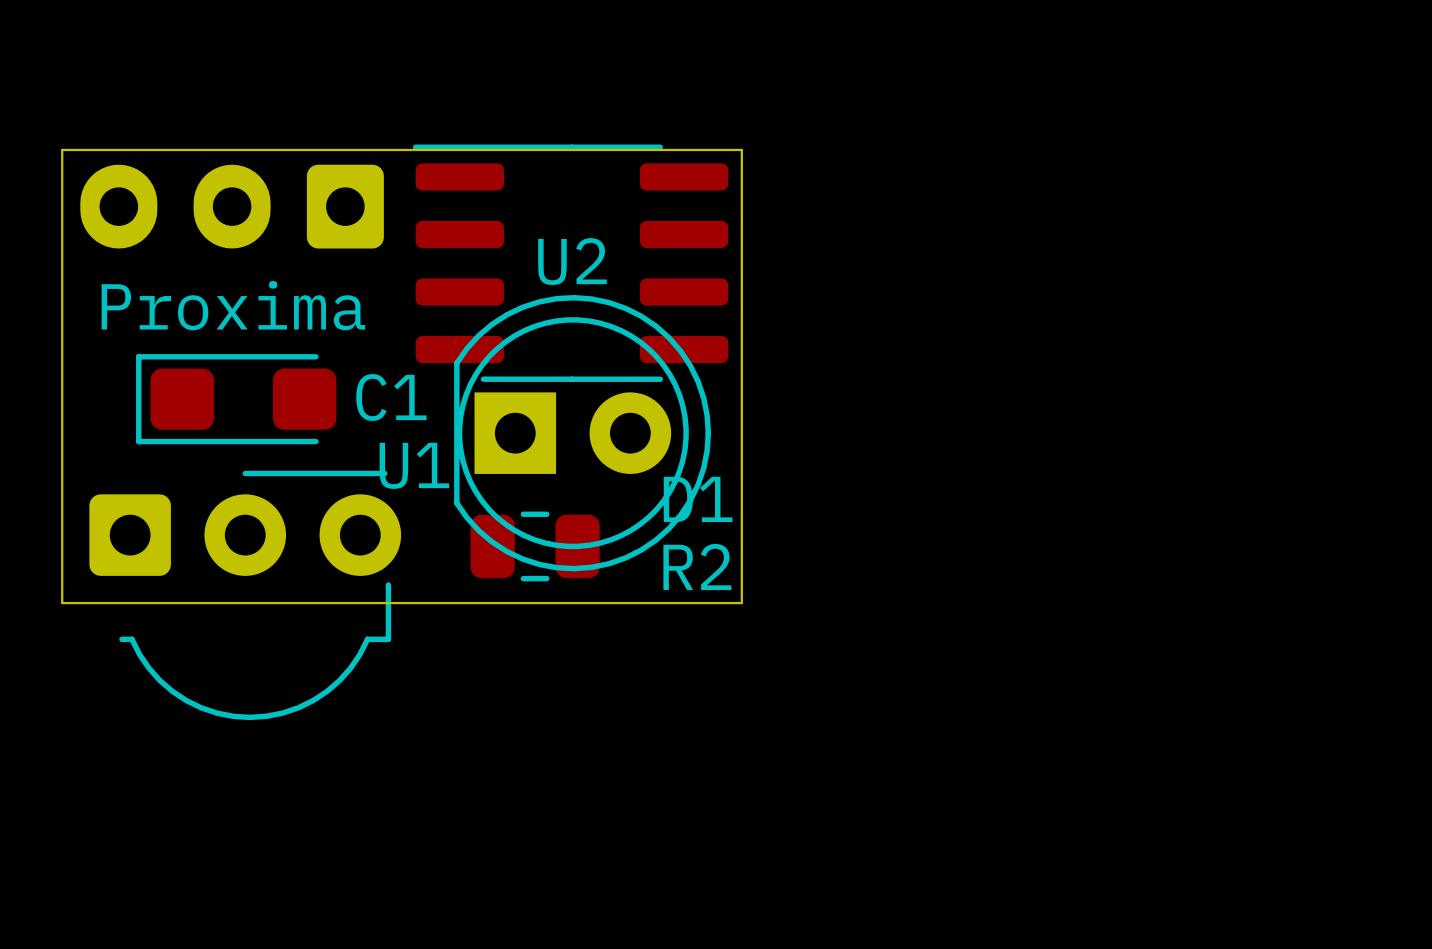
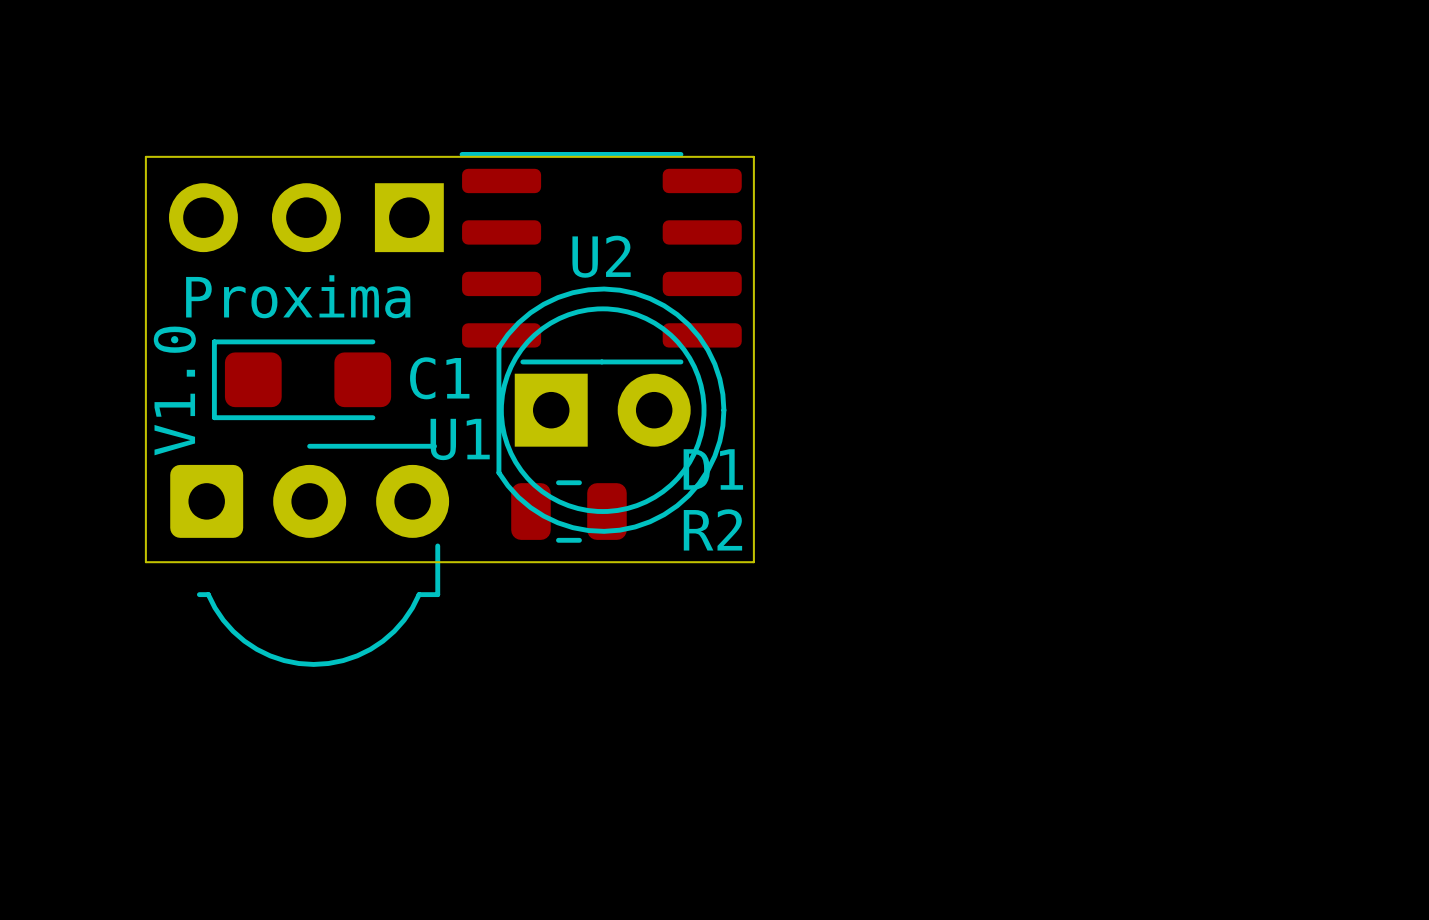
part footprint: [80, 164, 384, 249] -> [169, 183, 444, 253]
text: none -> V1.0 (174, 390)

